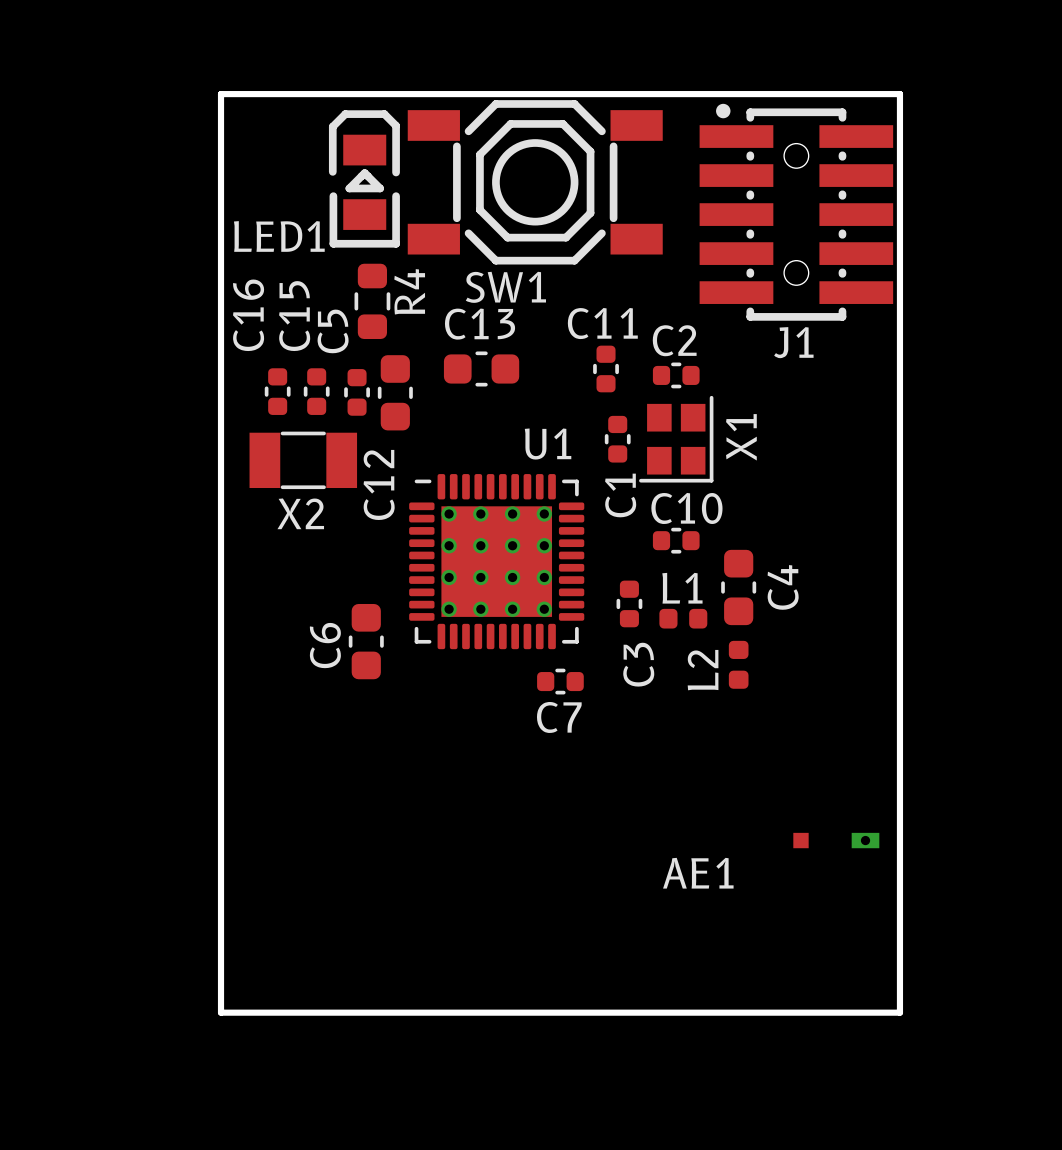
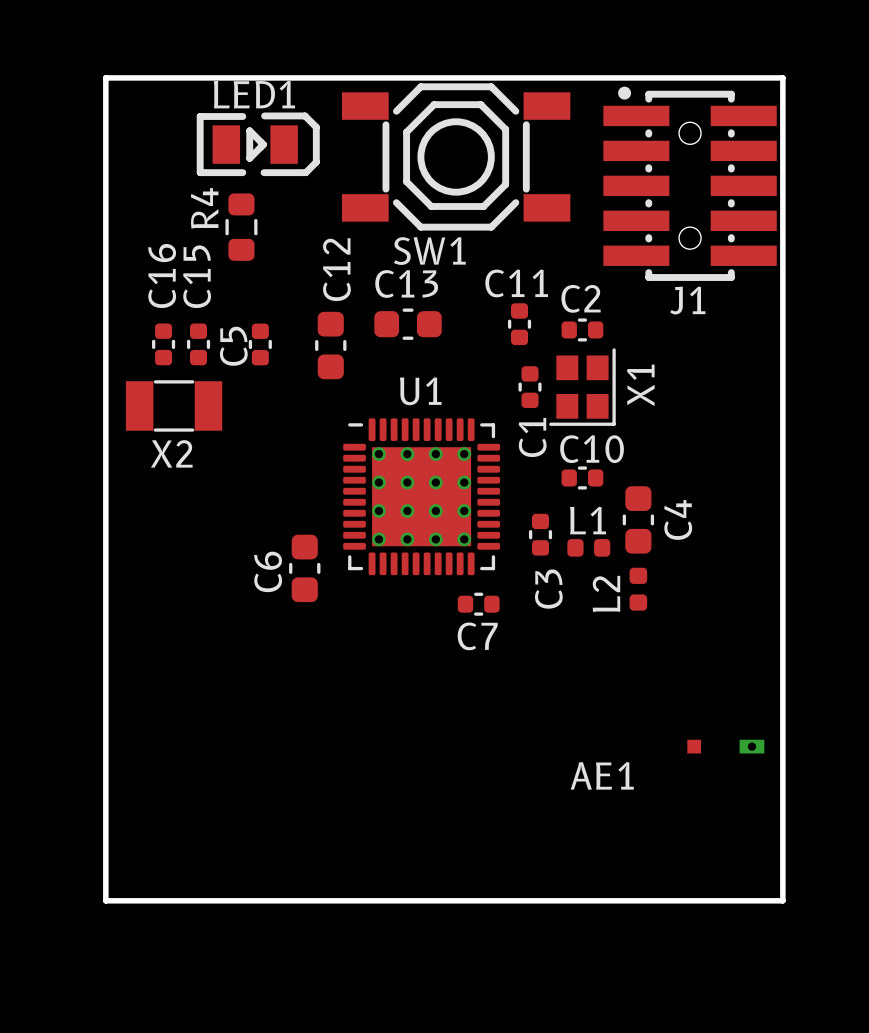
board edge: (221, 94) (221, 1012) -> (174, 77) (105, 77) (105, 900) (174, 900)
LED1 rotation: 0° (364, 178) -> 90° clockwise (258, 144)
LED1 name position: LED1 (279, 236) -> LED1 (254, 94)
R4 name position: R4 (409, 291) -> R4 (204, 208)
R4 position: (372, 301) -> (241, 227)
C16 name position: C16 (248, 315) -> C16 (162, 276)
C15 name: C15 (294, 316) -> C5 (233, 346)
C15: none -> (198, 344)
C16 position: (277, 391) -> (163, 344)
C5: (357, 392) -> none
U1 name position: U1 (548, 444) -> U1 (420, 391)
X2 position: (303, 460) -> (174, 405)
C12 name position: C12 (379, 484) -> C12 (336, 269)

